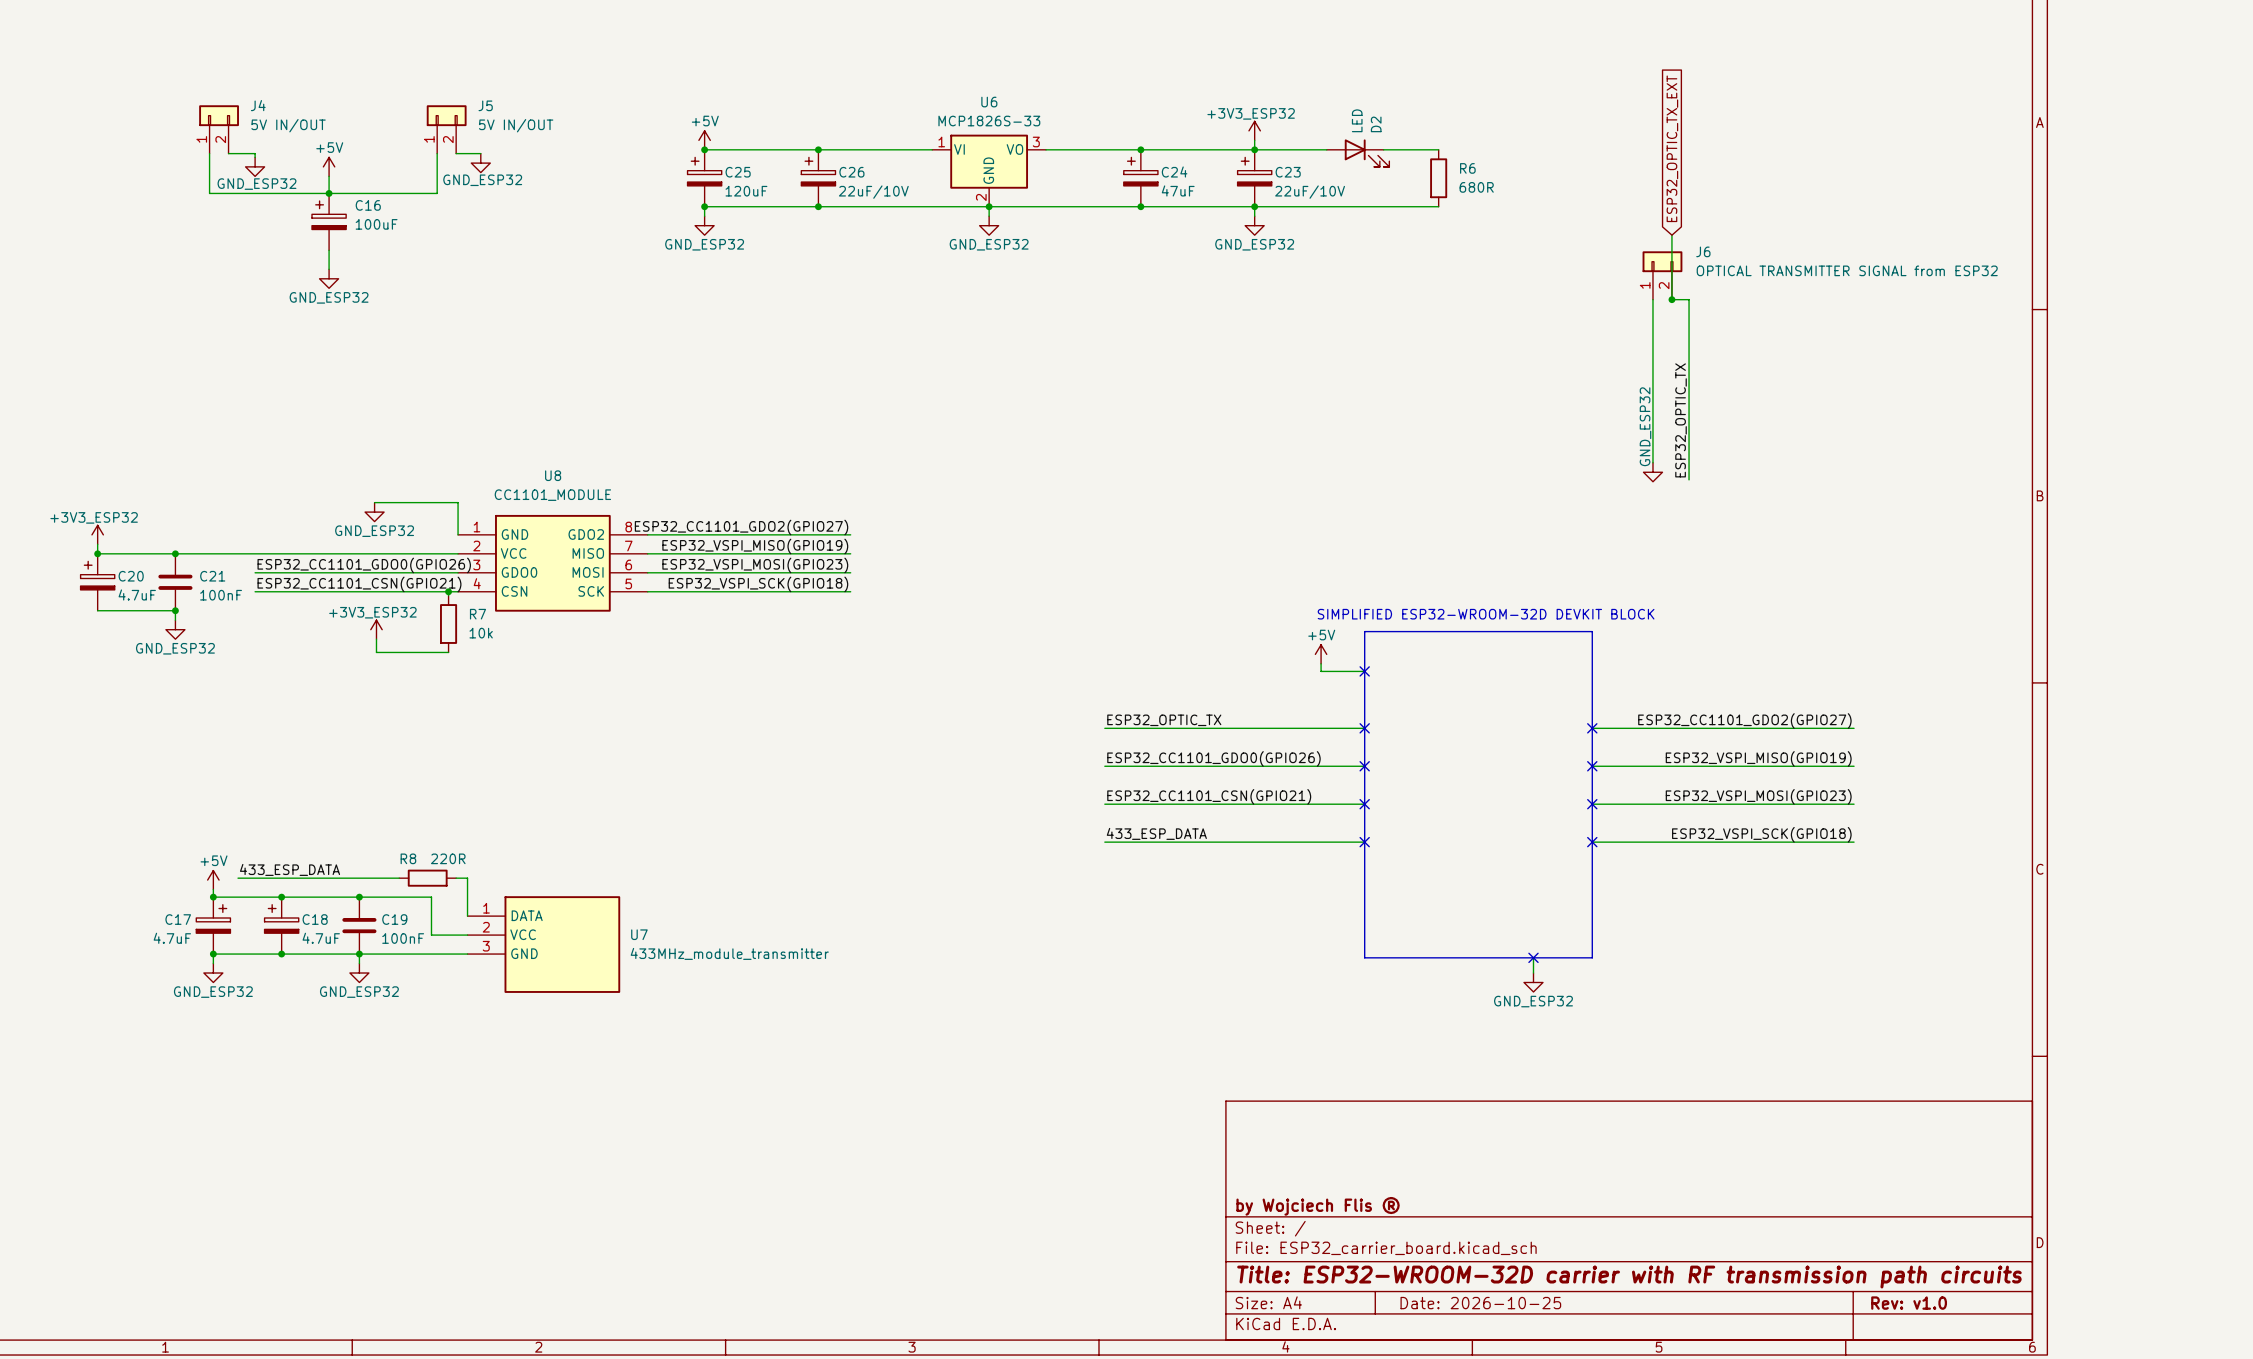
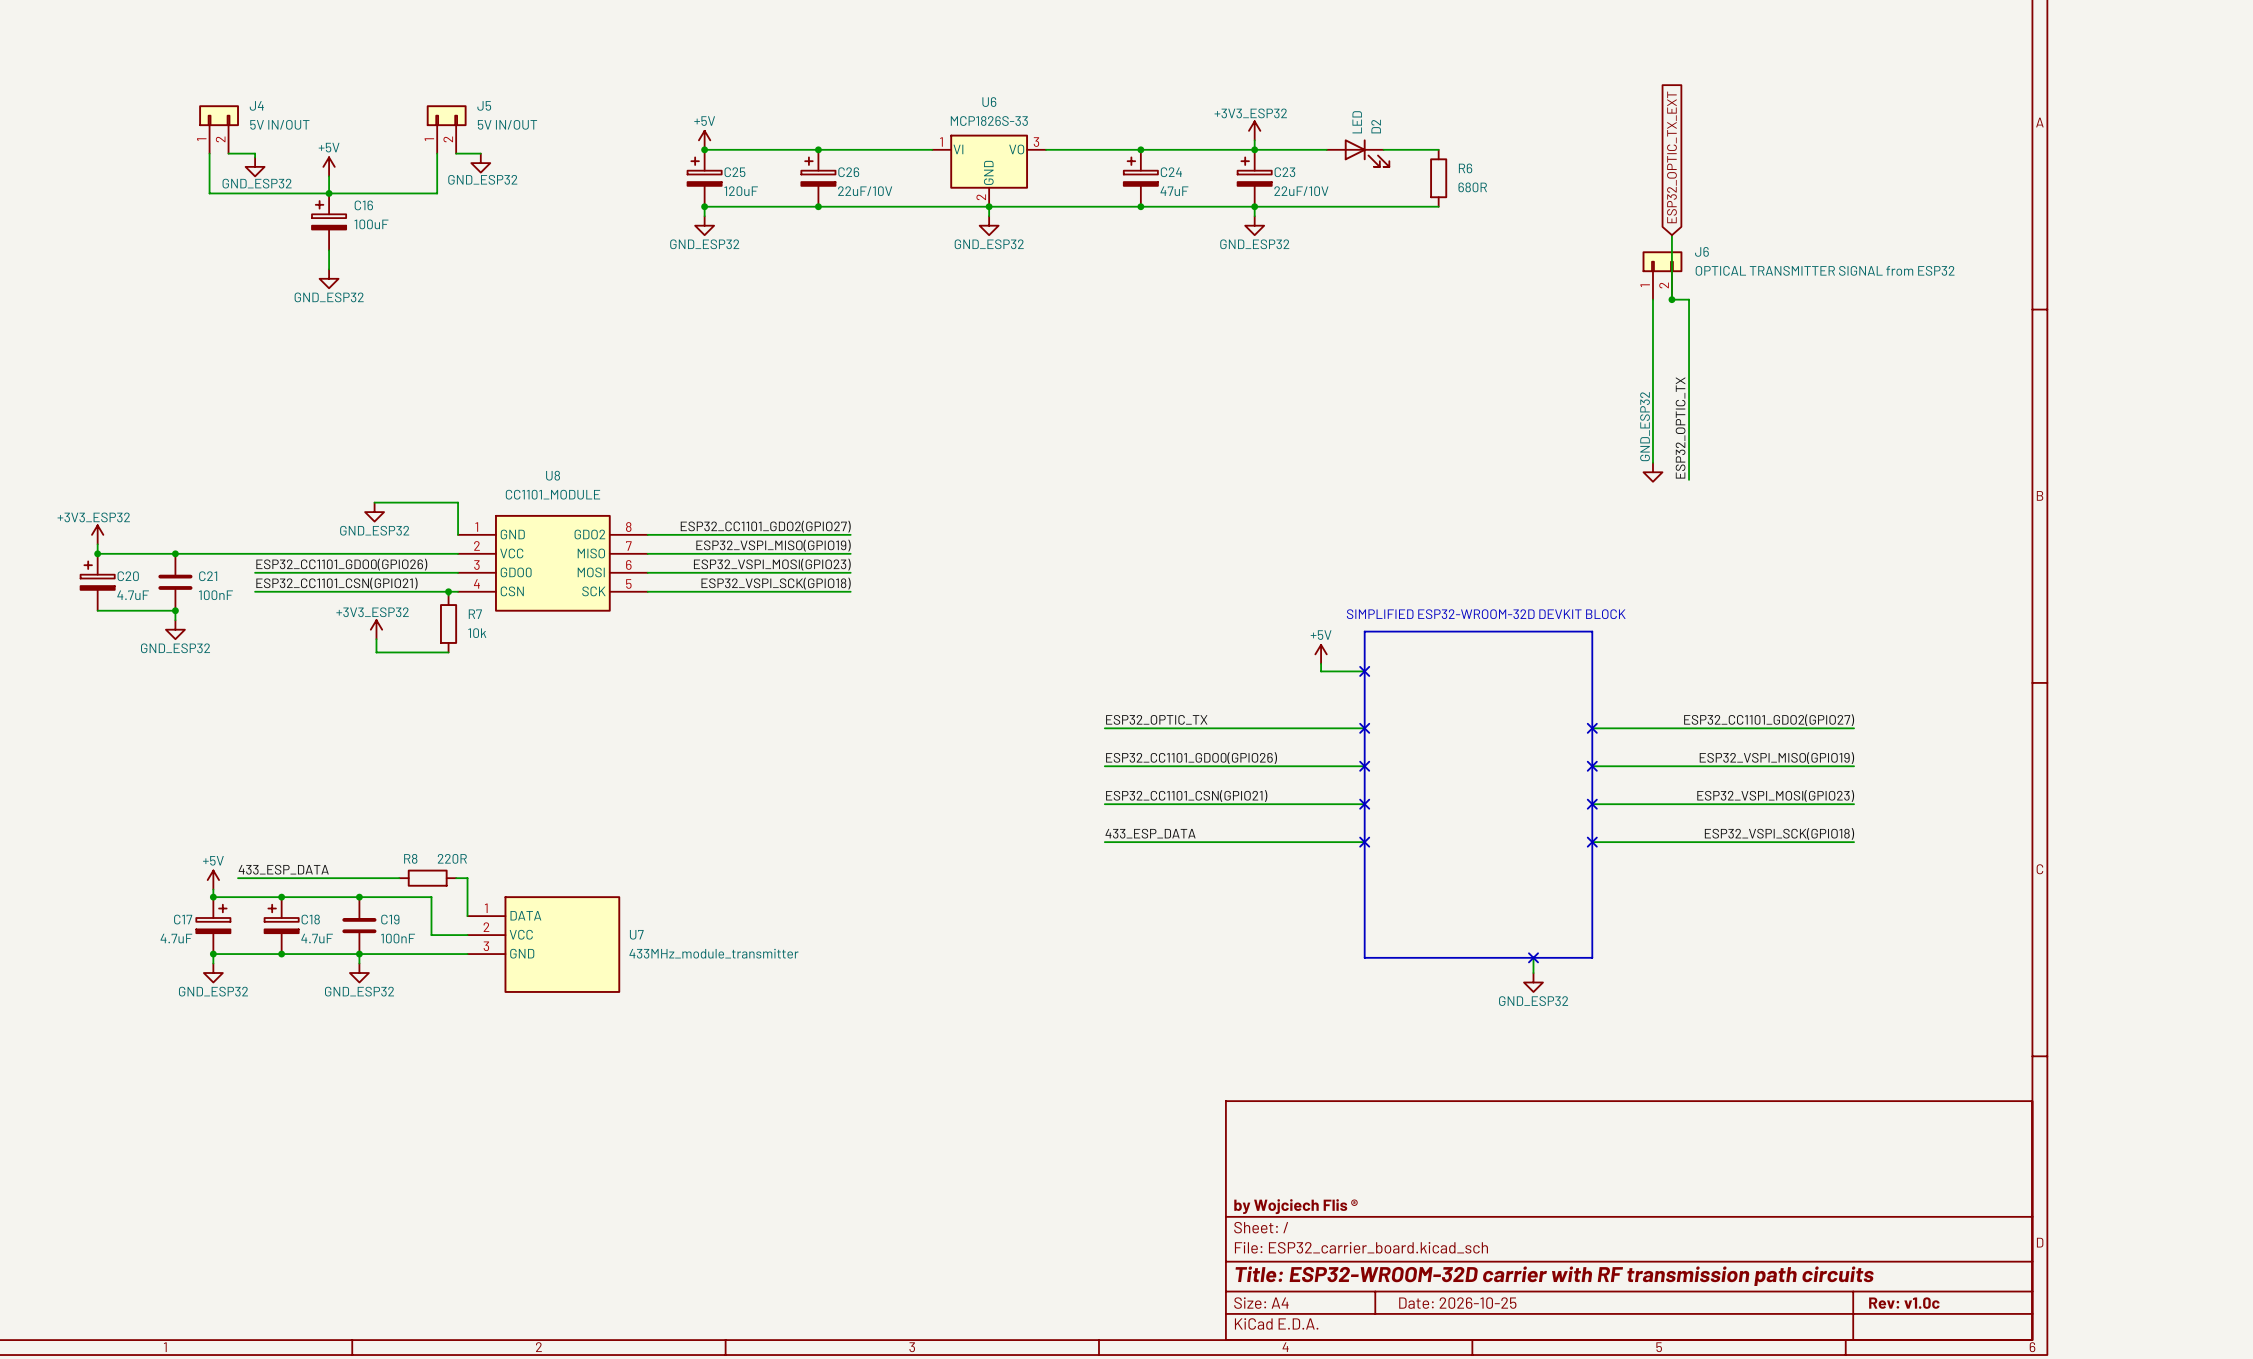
title block: Rev: v1.0 (1909, 1303) -> Rev: v1.0c (1904, 1303)

